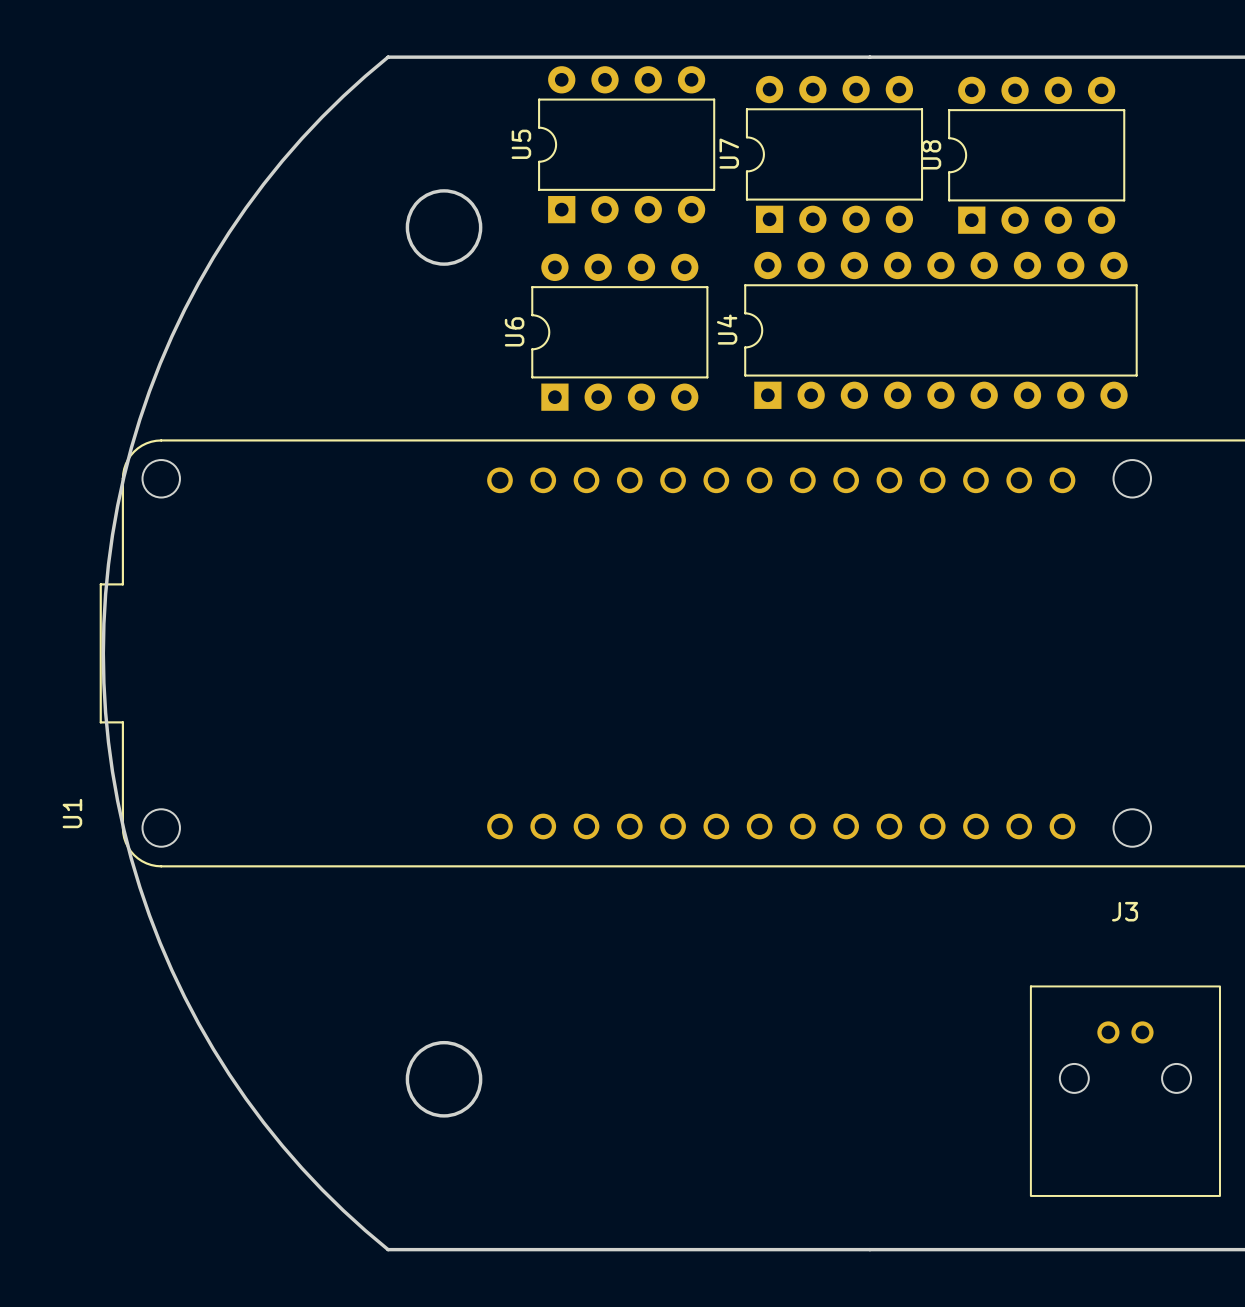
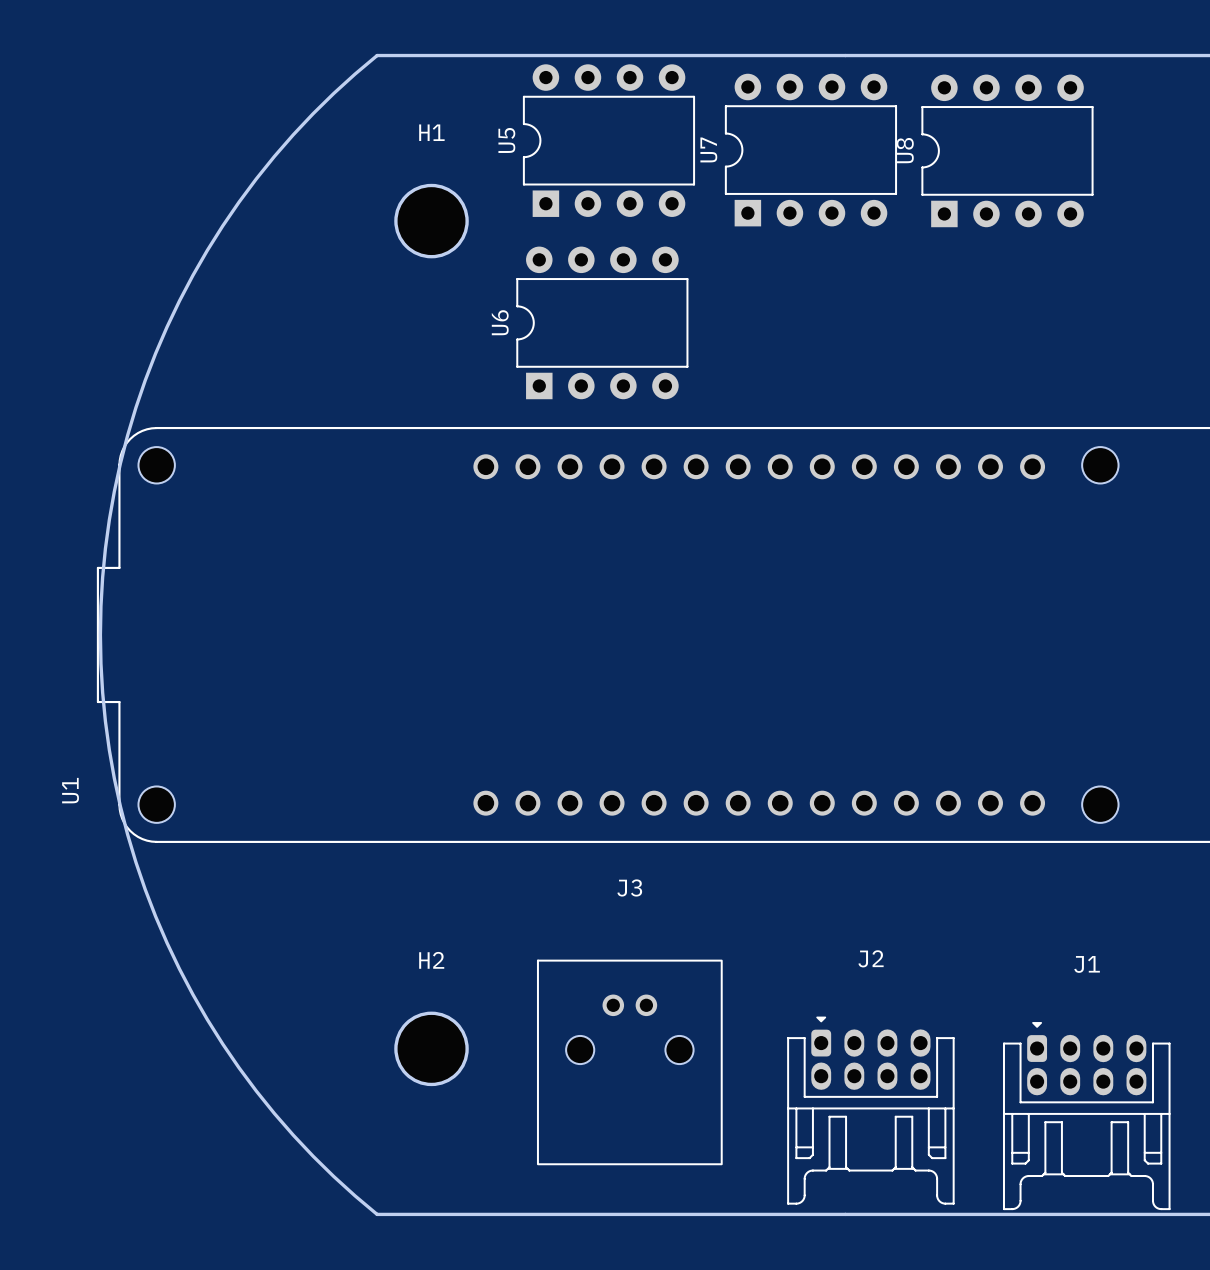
H1: none -> (431, 221)
U4: (940, 330) -> none
H2: none -> (431, 1048)
J3 position: (1125, 1091) -> (629, 1062)
J2: none -> (870, 1110)
J1: none -> (1086, 1115)

